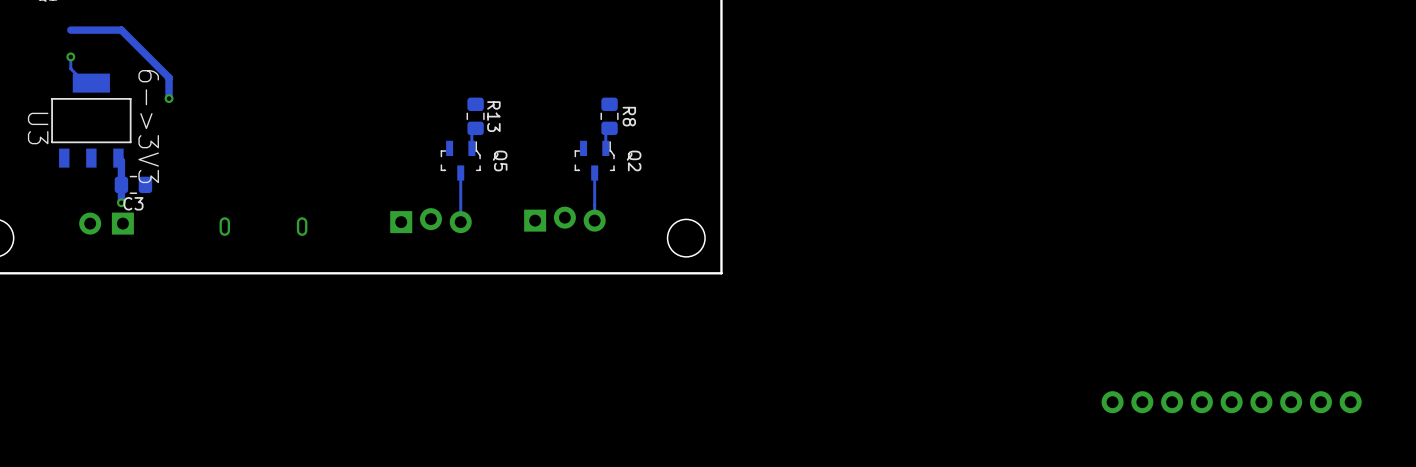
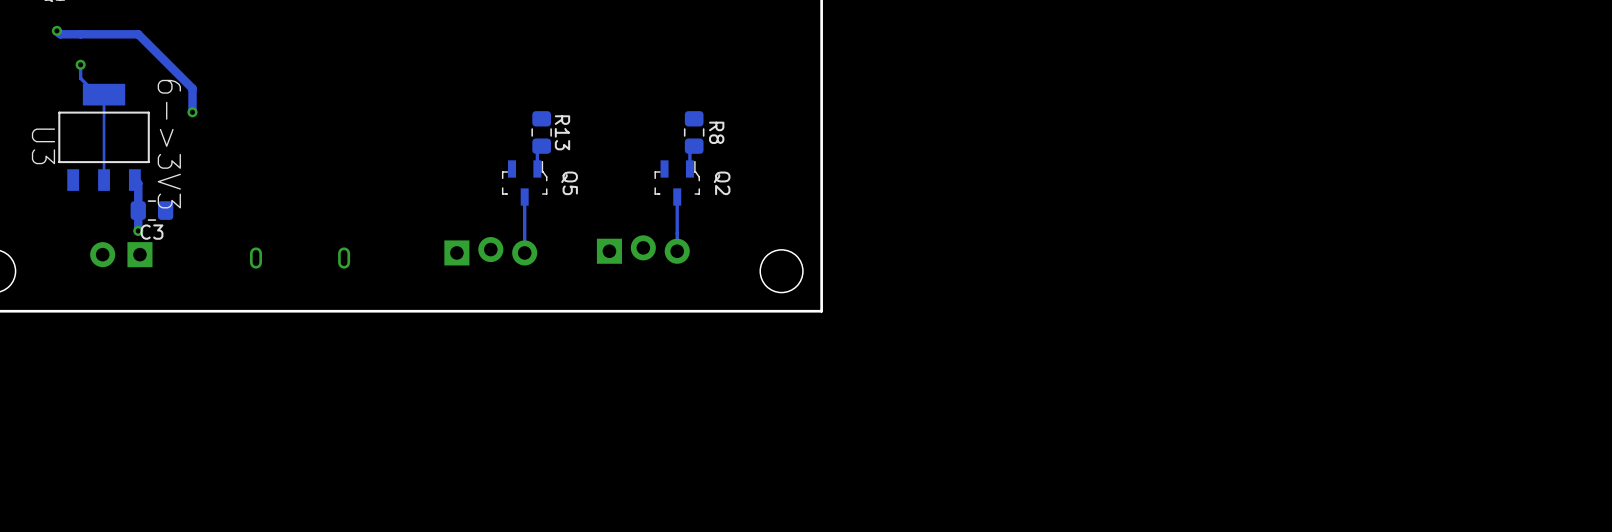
track: none -> (56, 30) (60, 34) (80, 34)
via: none -> (56, 30)
track: none -> (104, 94) (104, 180)
part: (1231, 402) -> none

